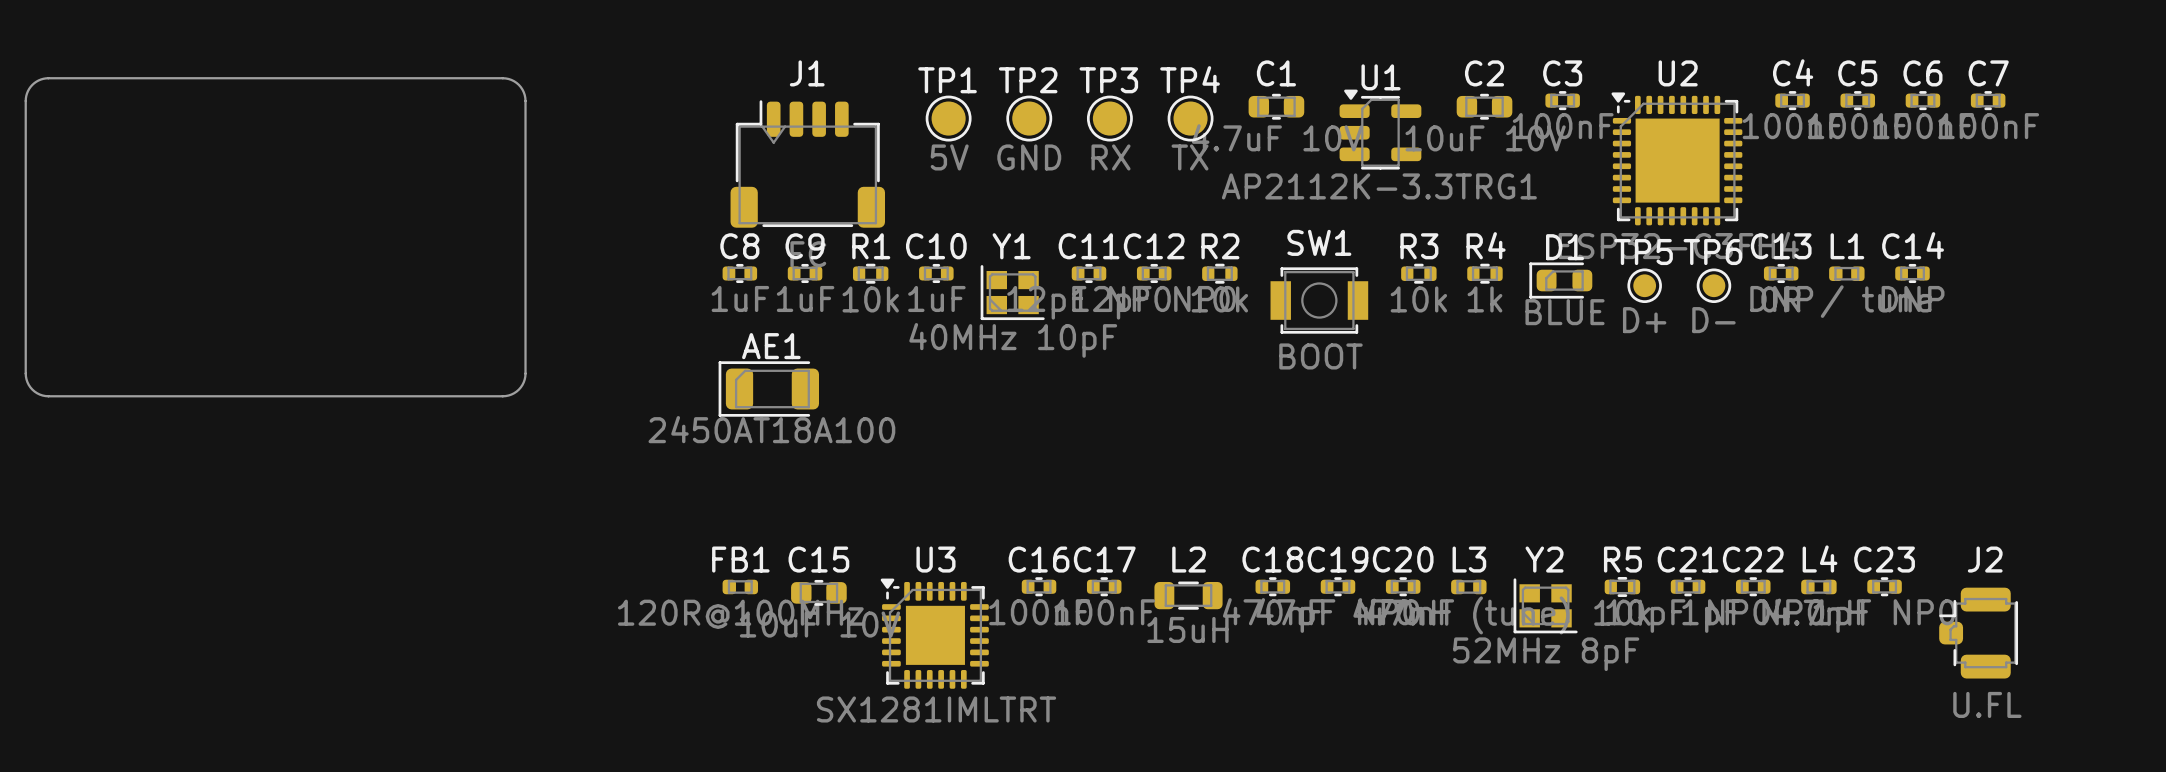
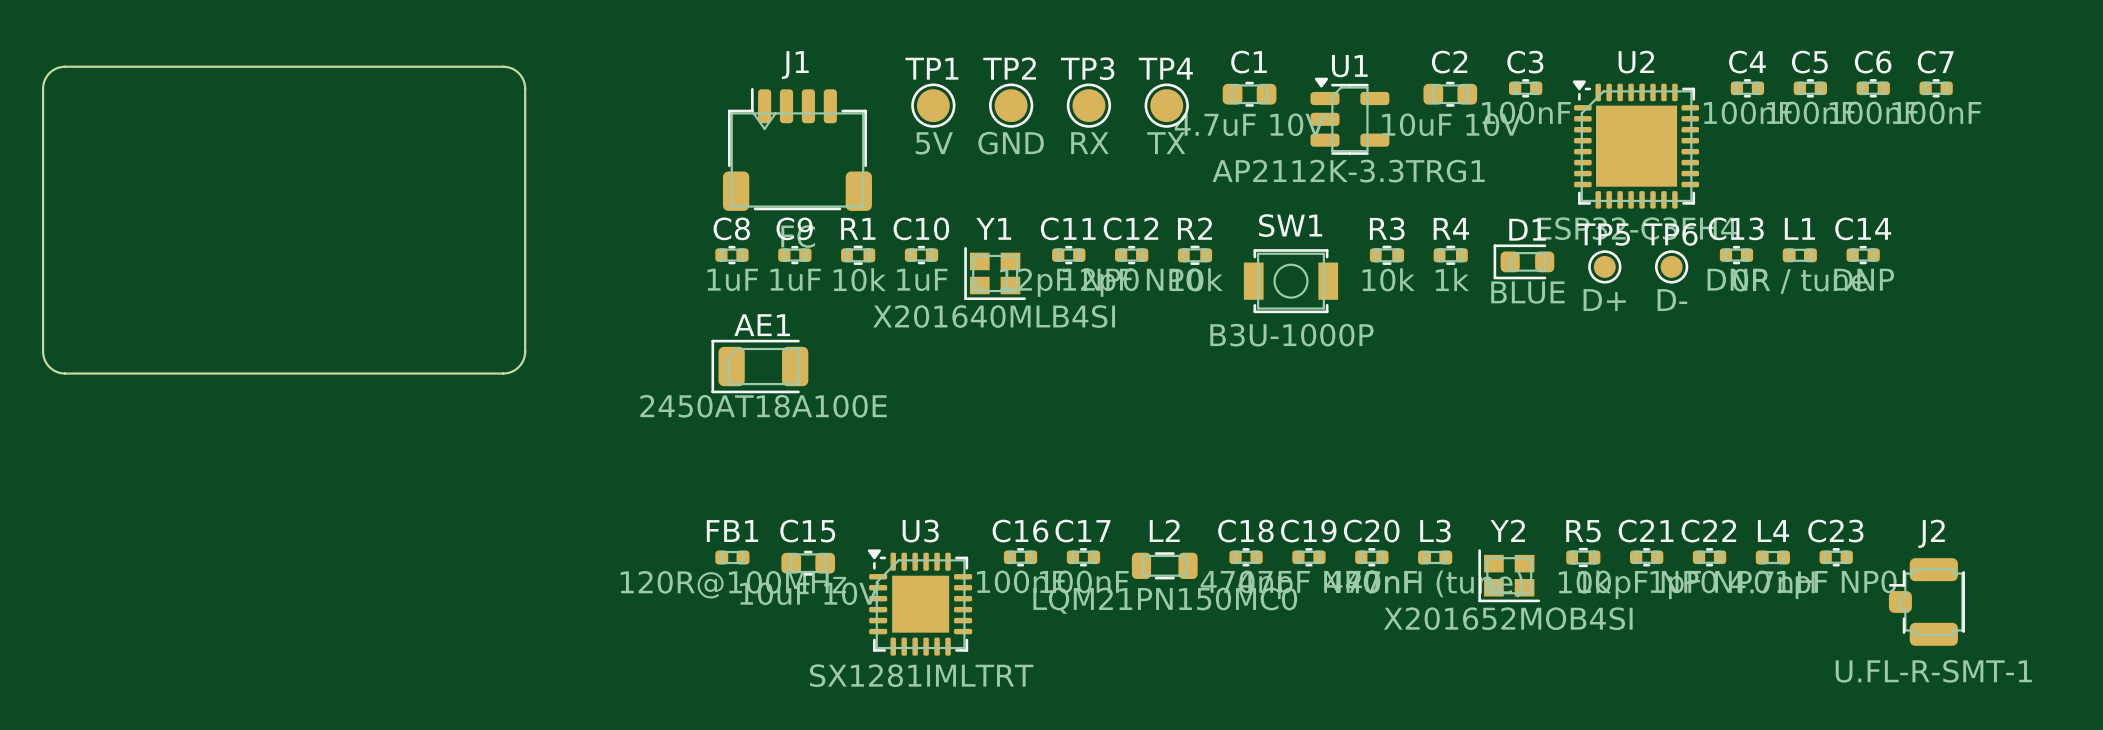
Y1 value: 40MHz 10pF (1013, 340) -> X201640MLB4SI (994, 316)
SW1 value: BOOT (1320, 356) -> B3U-1000P (1291, 335)
AE1 value: 2450AT18A100 (771, 429) -> 2450AT18A100E (763, 406)
L2 value: 15uH (1187, 629) -> LQM21PN150MC0 (1165, 600)
Y2 value: 52MHz 8pF (1546, 654) -> X201652MOB4SI (1508, 618)
J2 value: U.FL (1987, 704) -> U.FL-R-SMT-1 (1933, 671)

